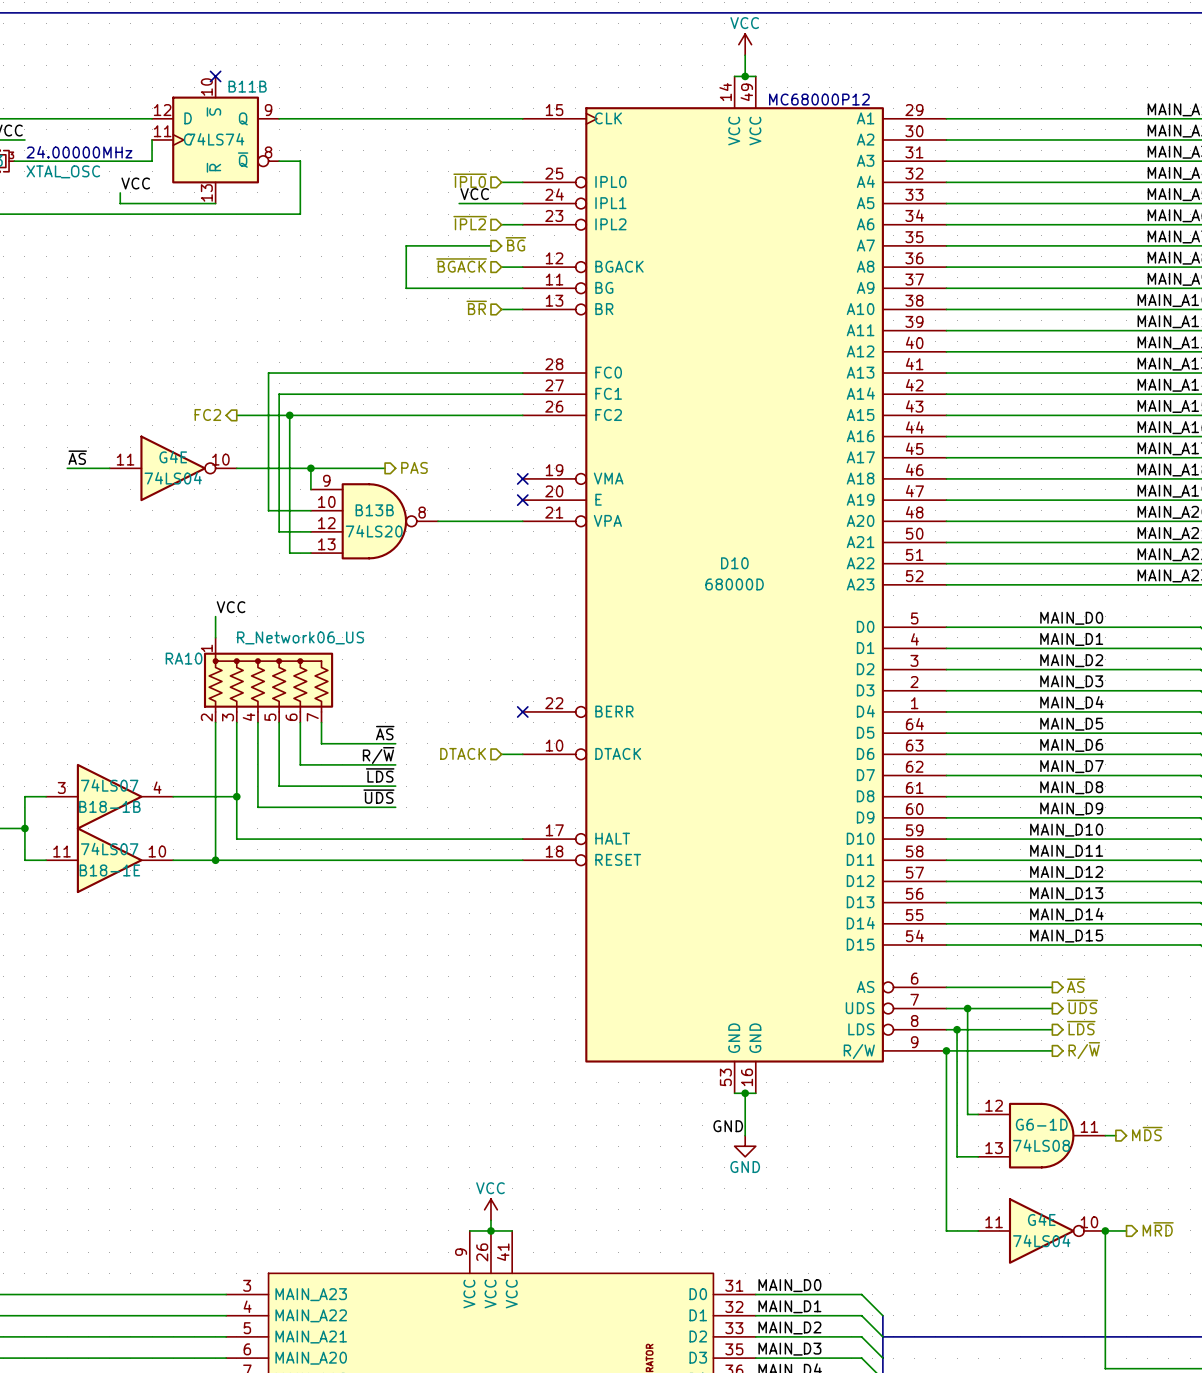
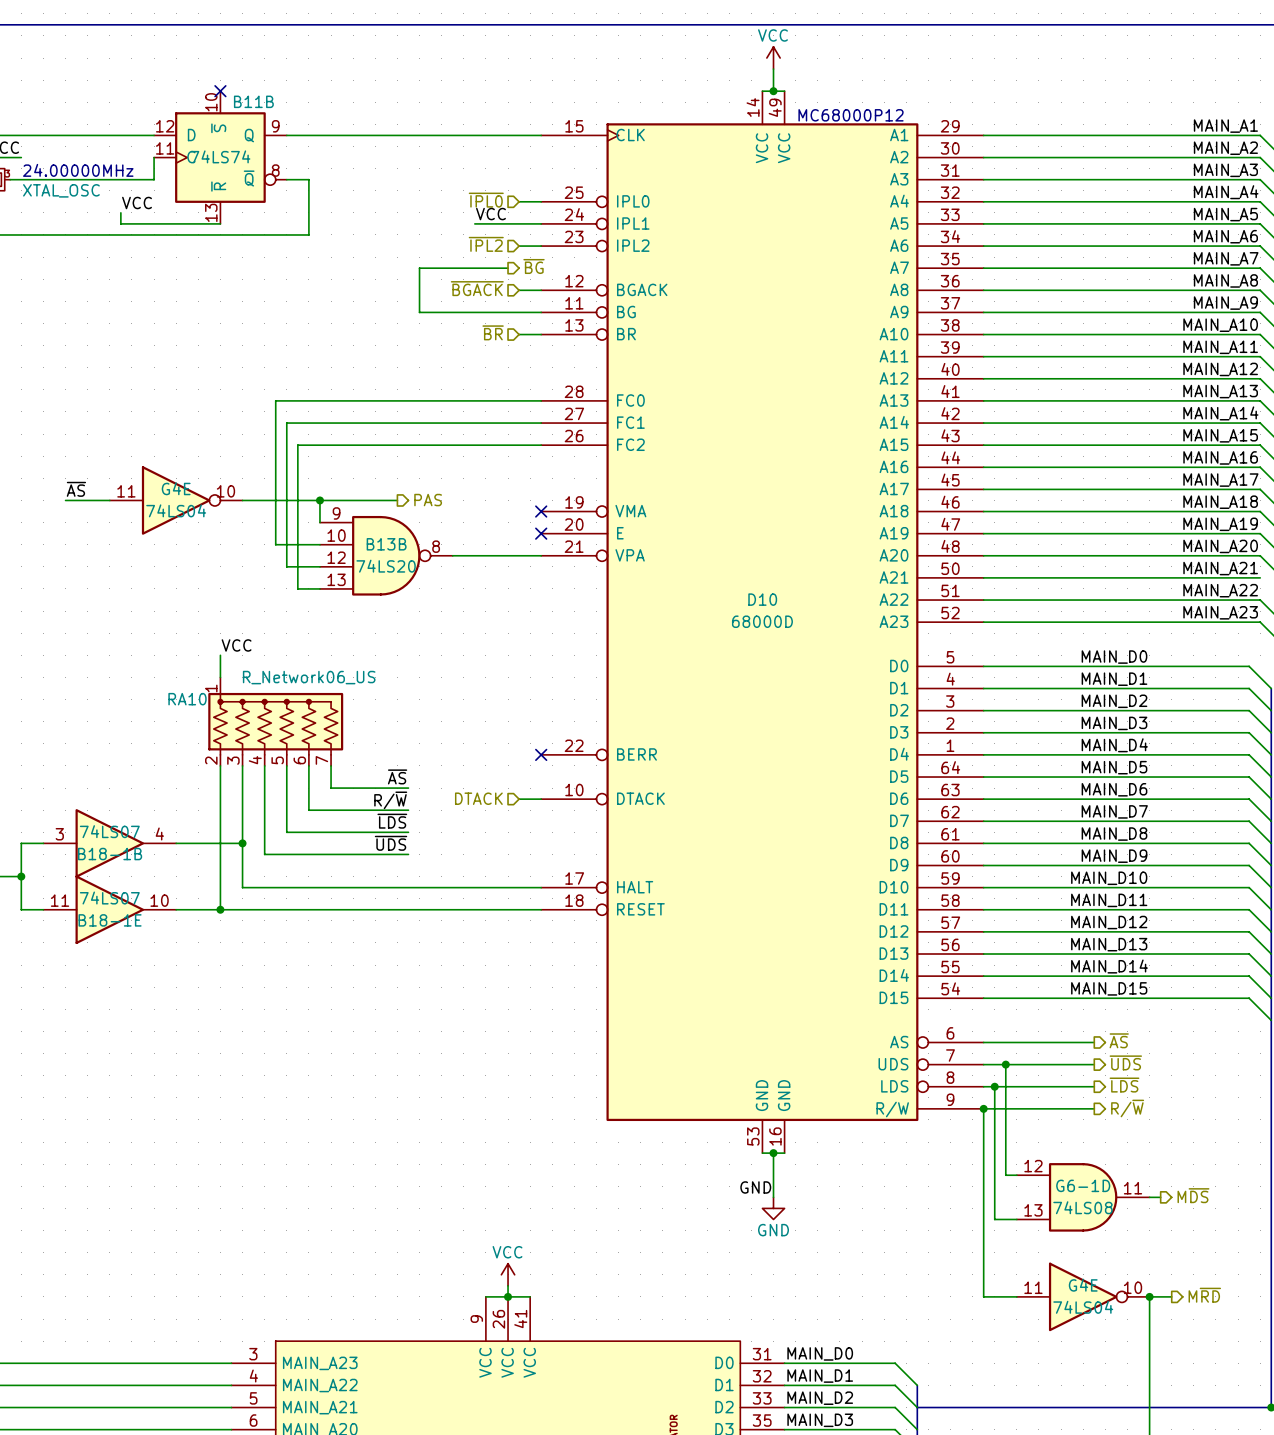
hierarchical label: FC2 (207, 414) -> none
wire: (236, 415) (289, 415) -> none
junction: (289, 415) -> none

